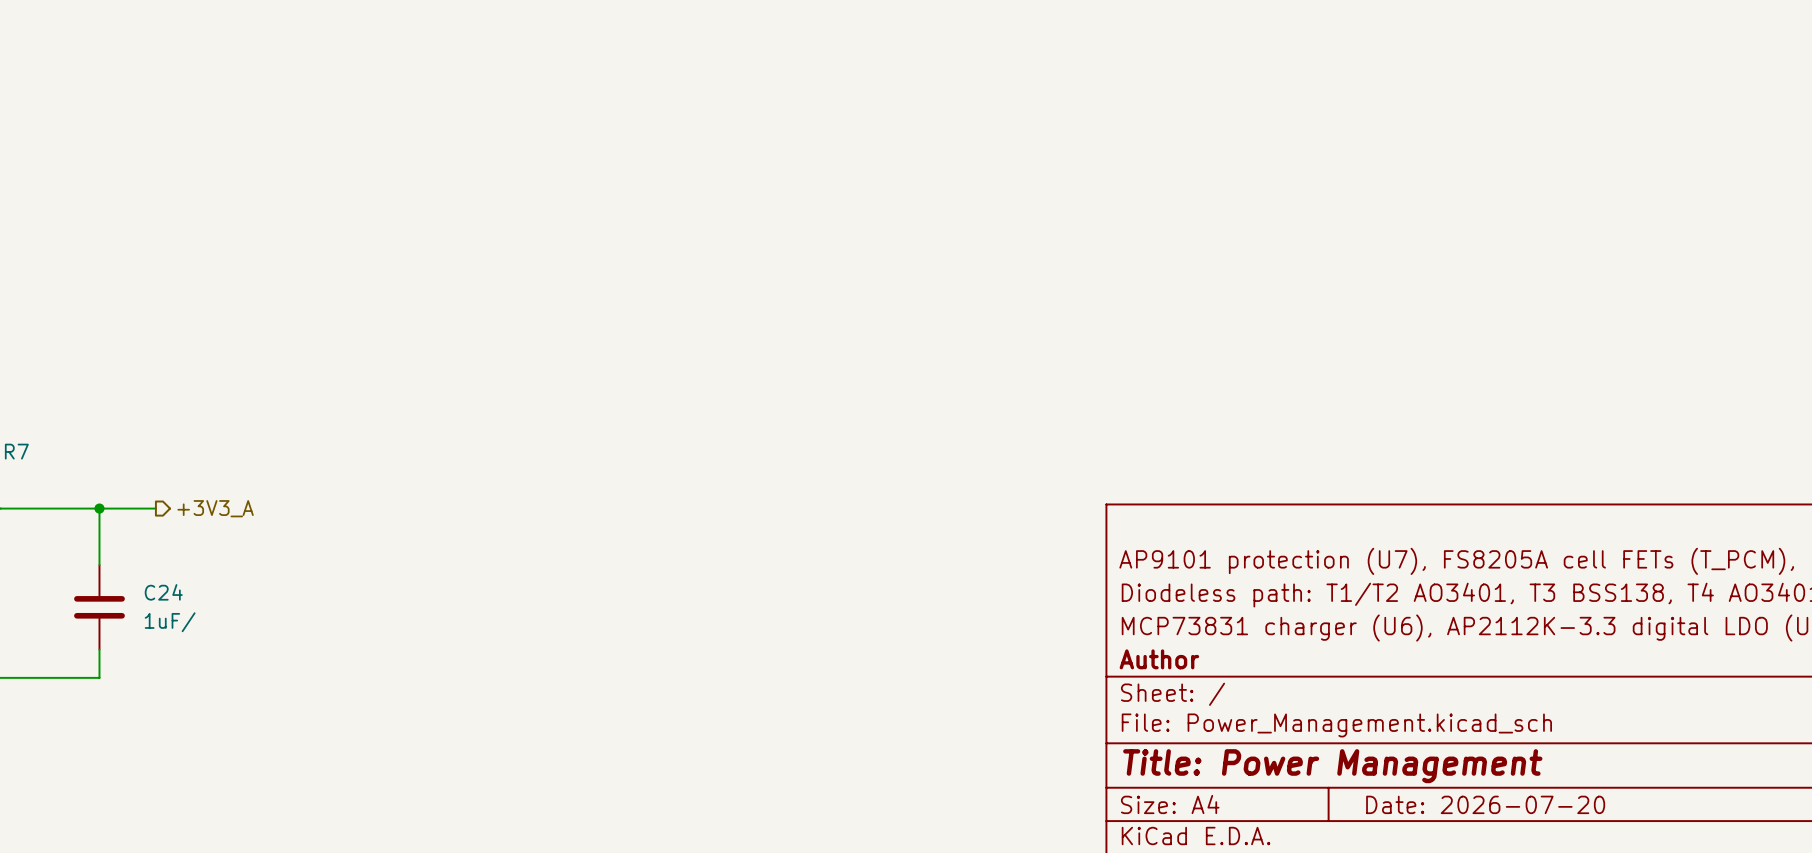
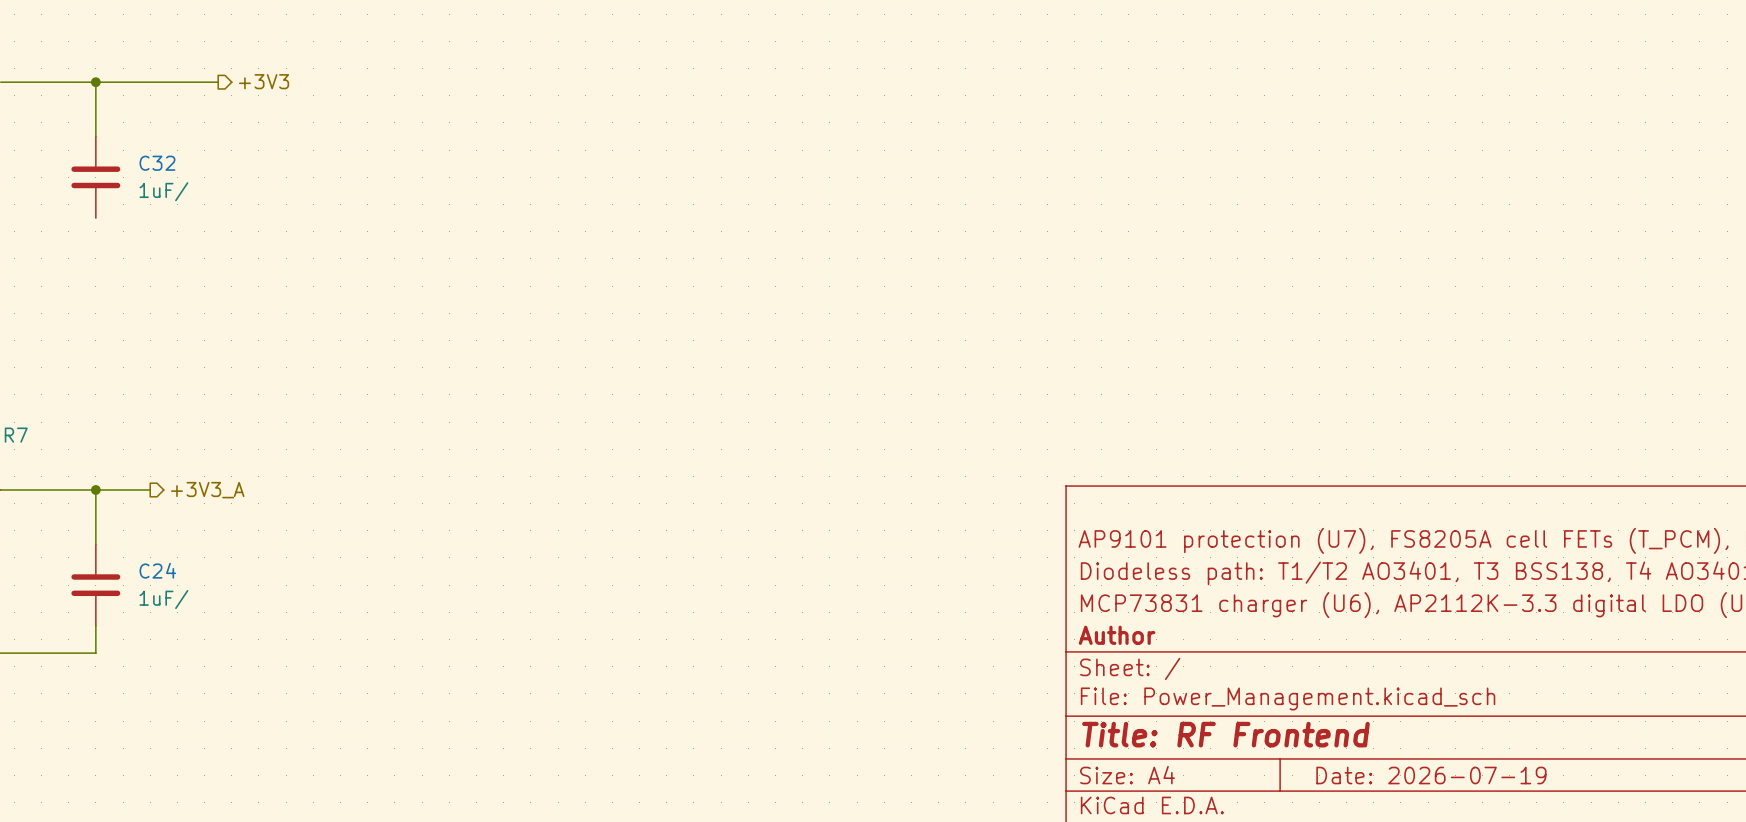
hierarchical label: none -> +3V3 (264, 81)
wire: none -> (0, 82) (218, 82)
wire: none -> (95, 82) (95, 136)
junction: none -> (95, 82)
C32: none -> 1uF/ (95, 177)
title block: Title: Power Management (1332, 766) -> Title: RF Frontend (1225, 734)
title block: Date: 2026-07-20 (1485, 804) -> Date: 2026-07-19 (1431, 775)

